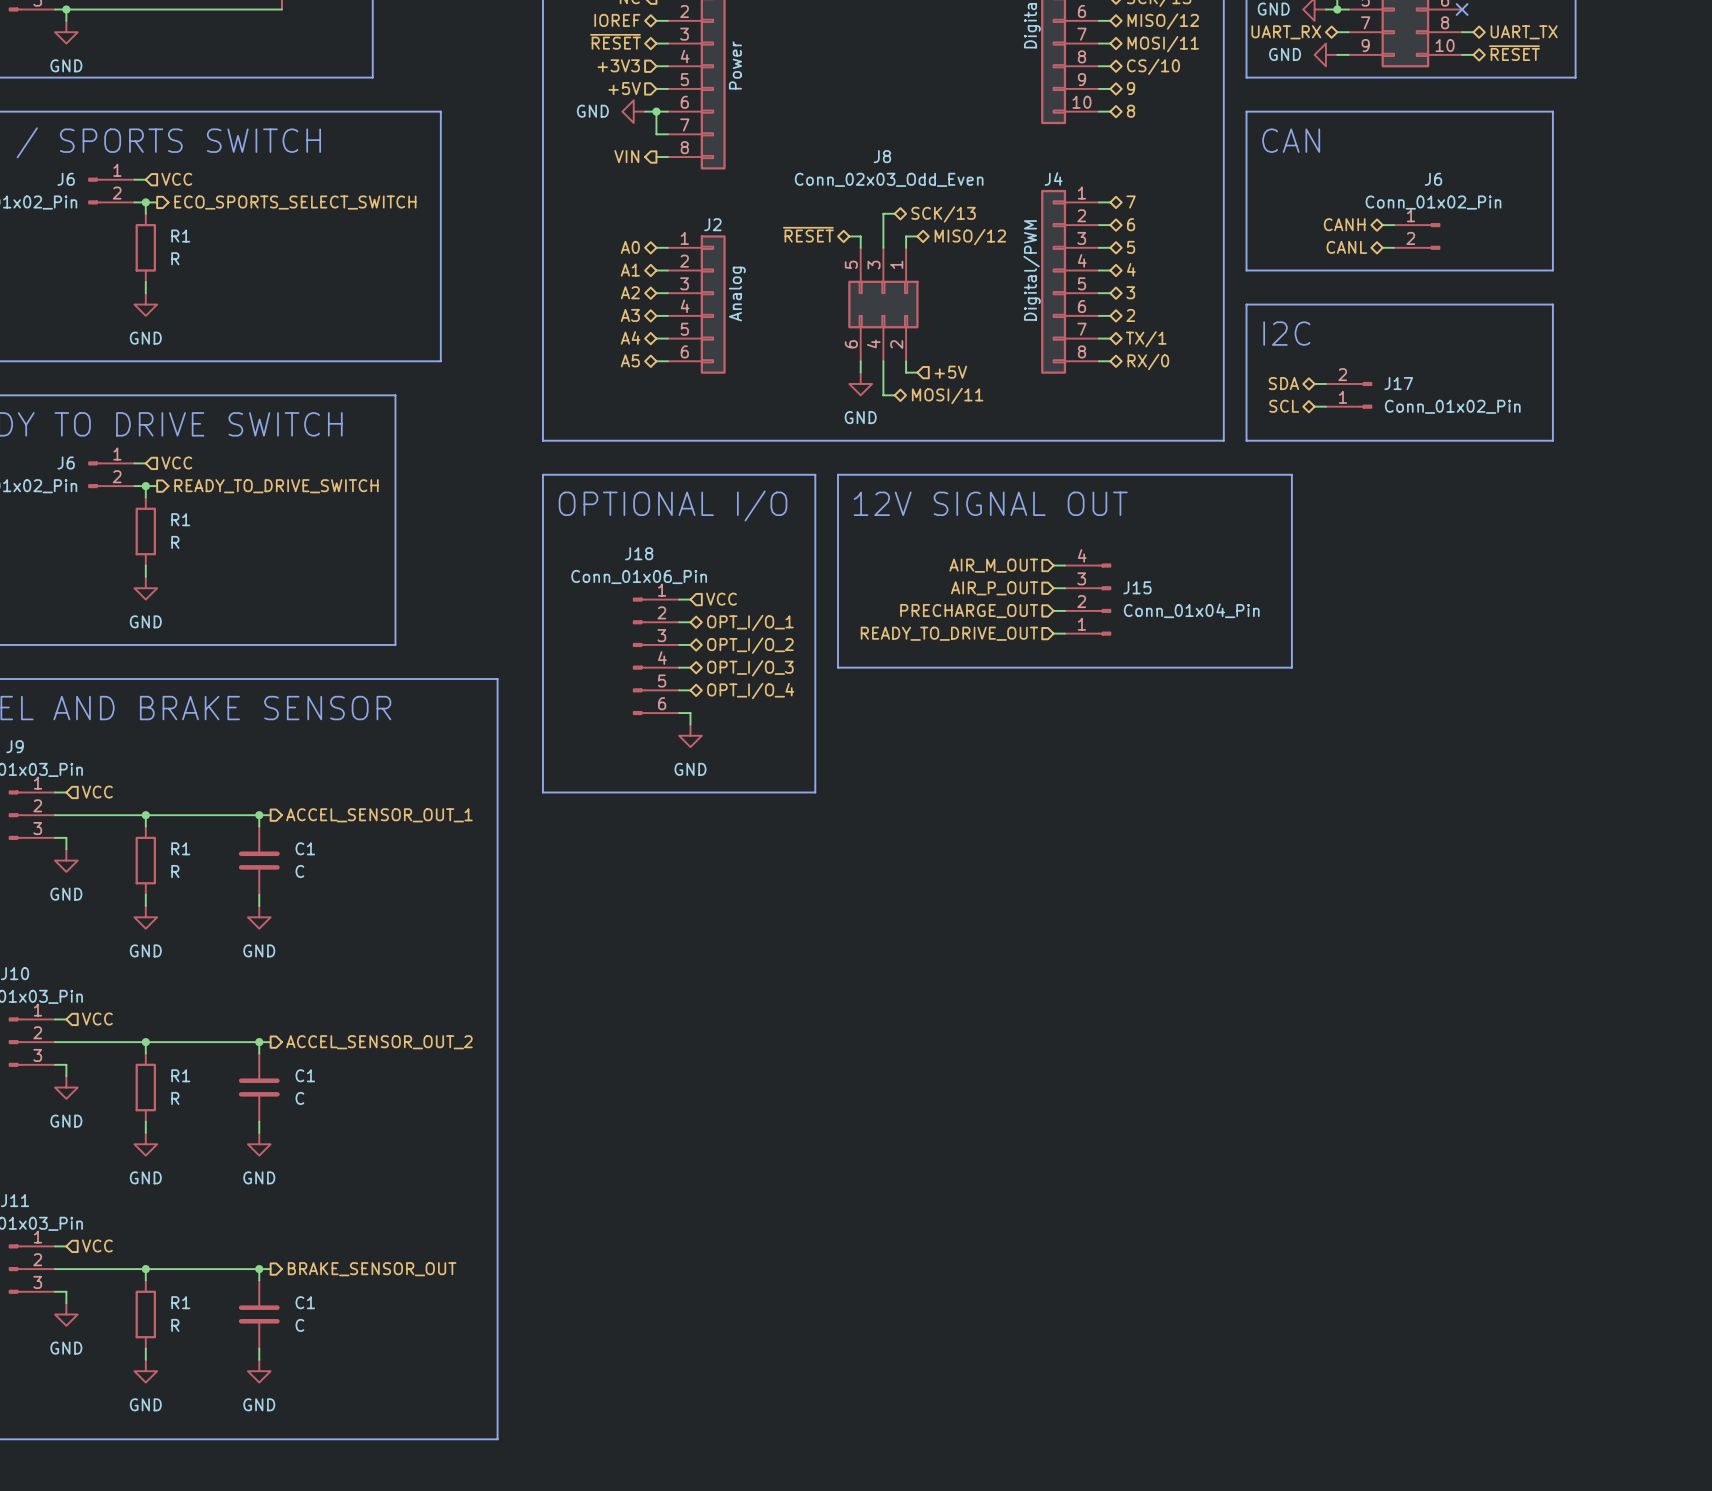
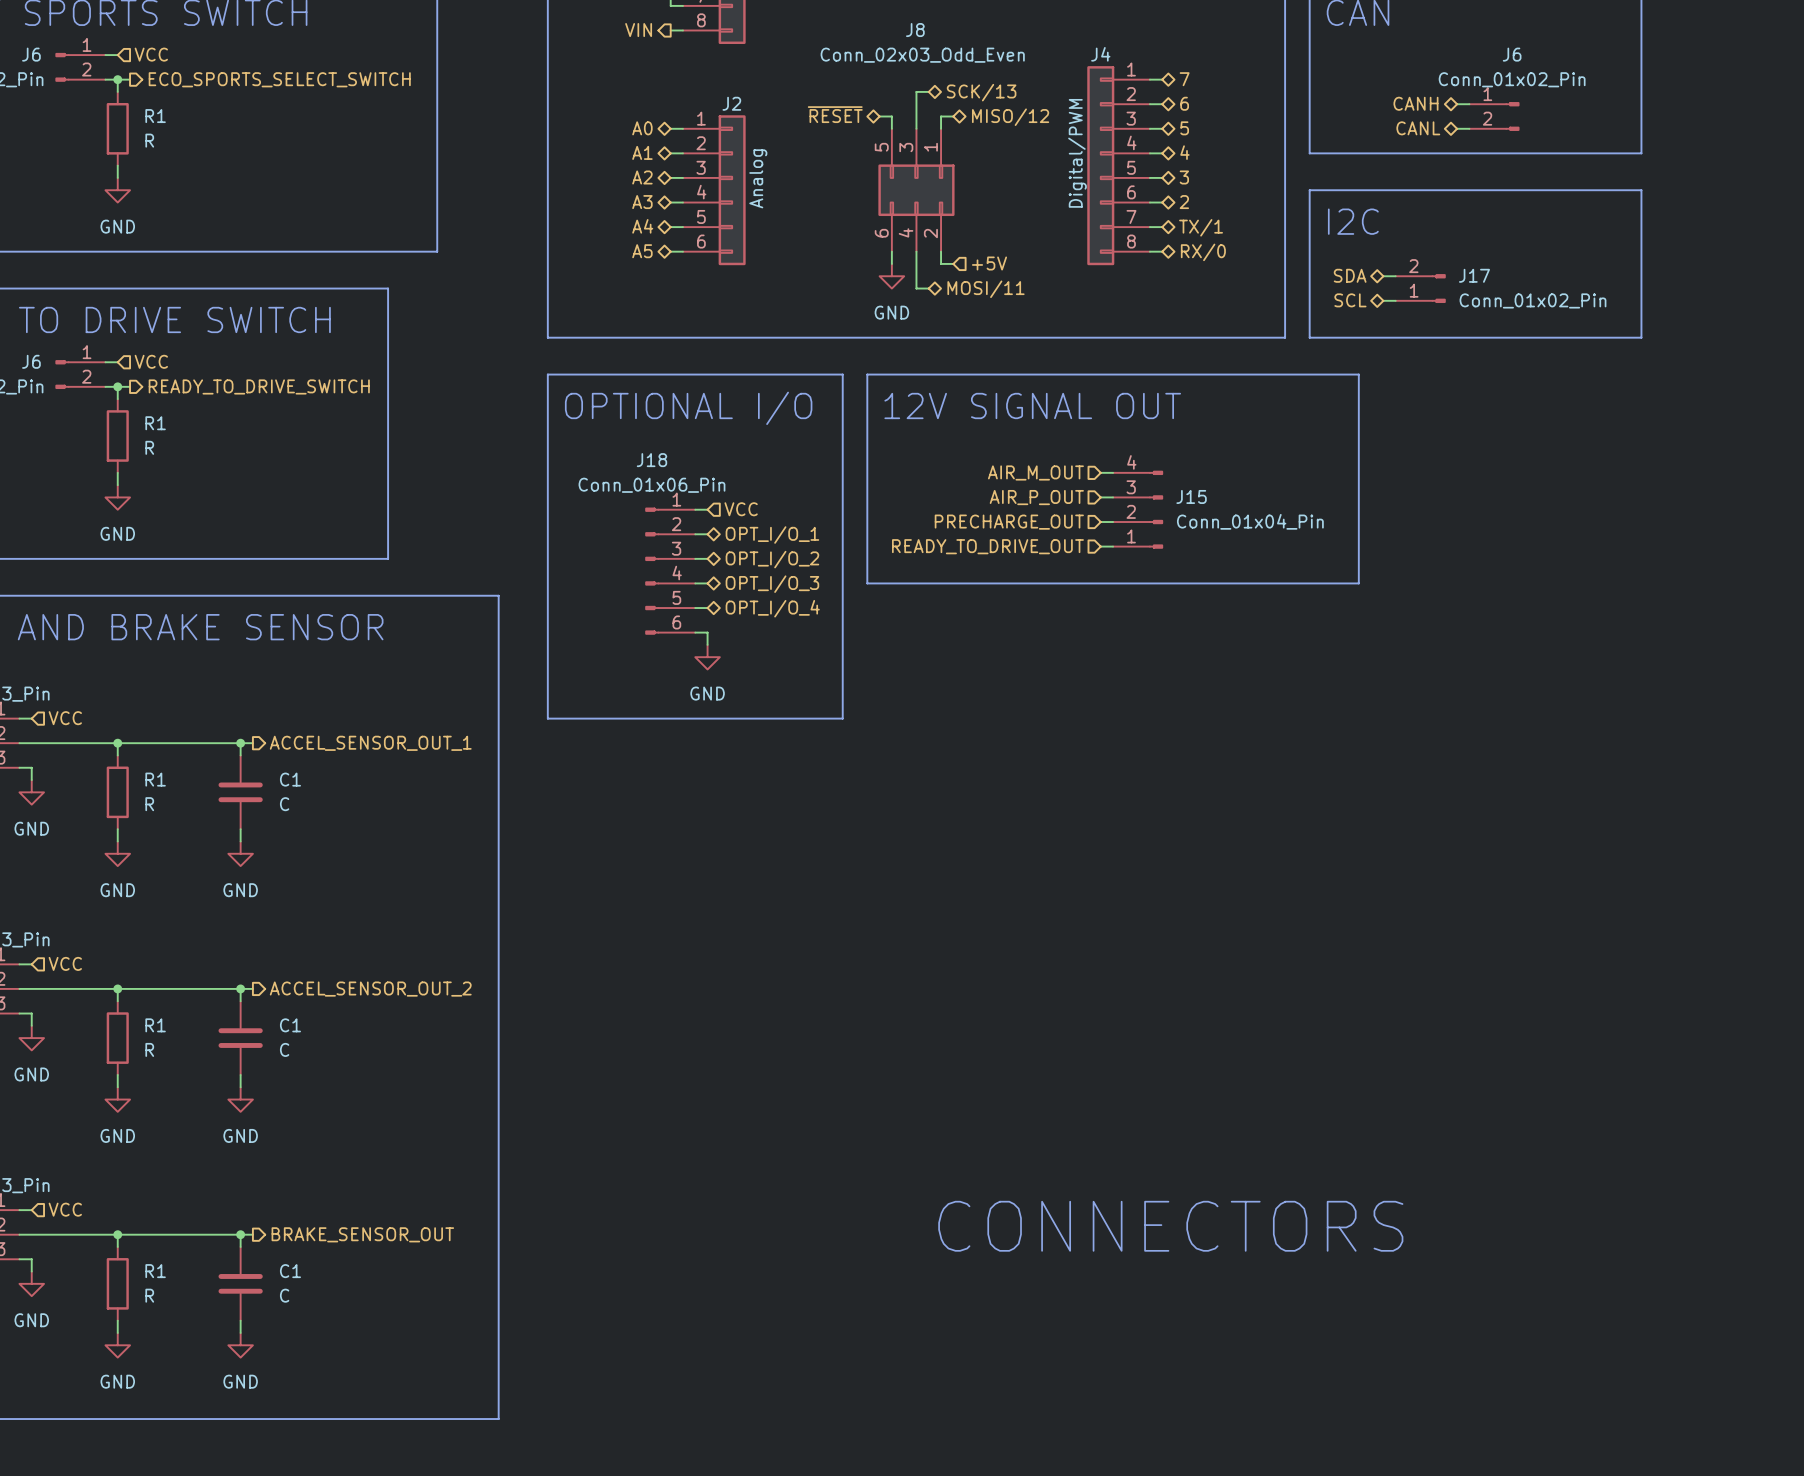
text: none -> CONNECTORS (1170, 1226)

